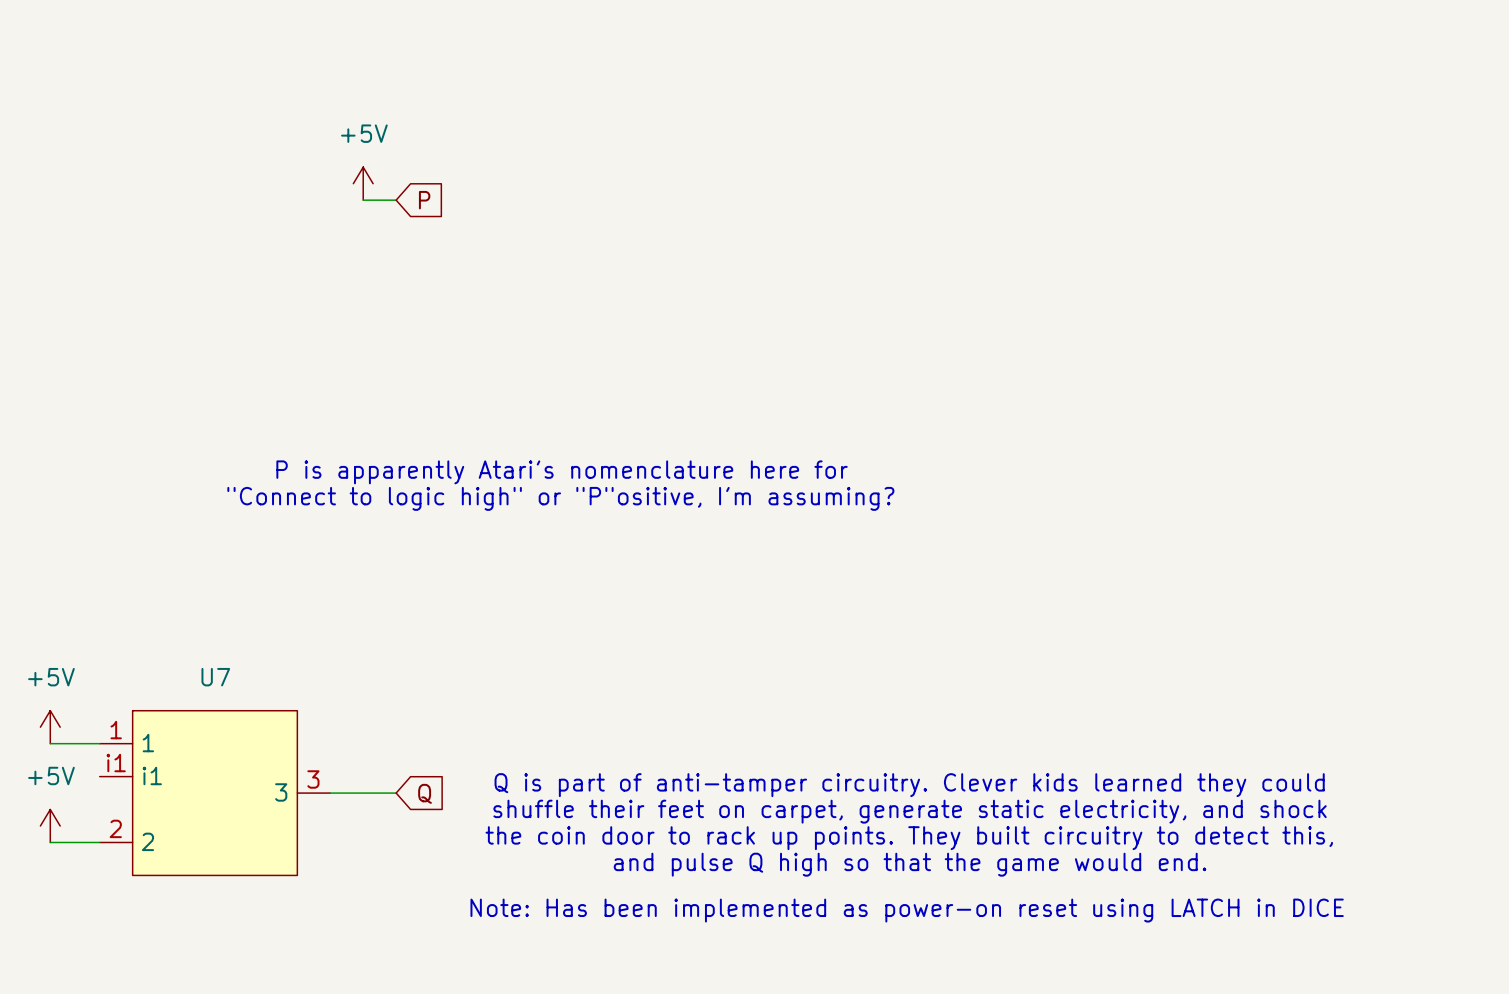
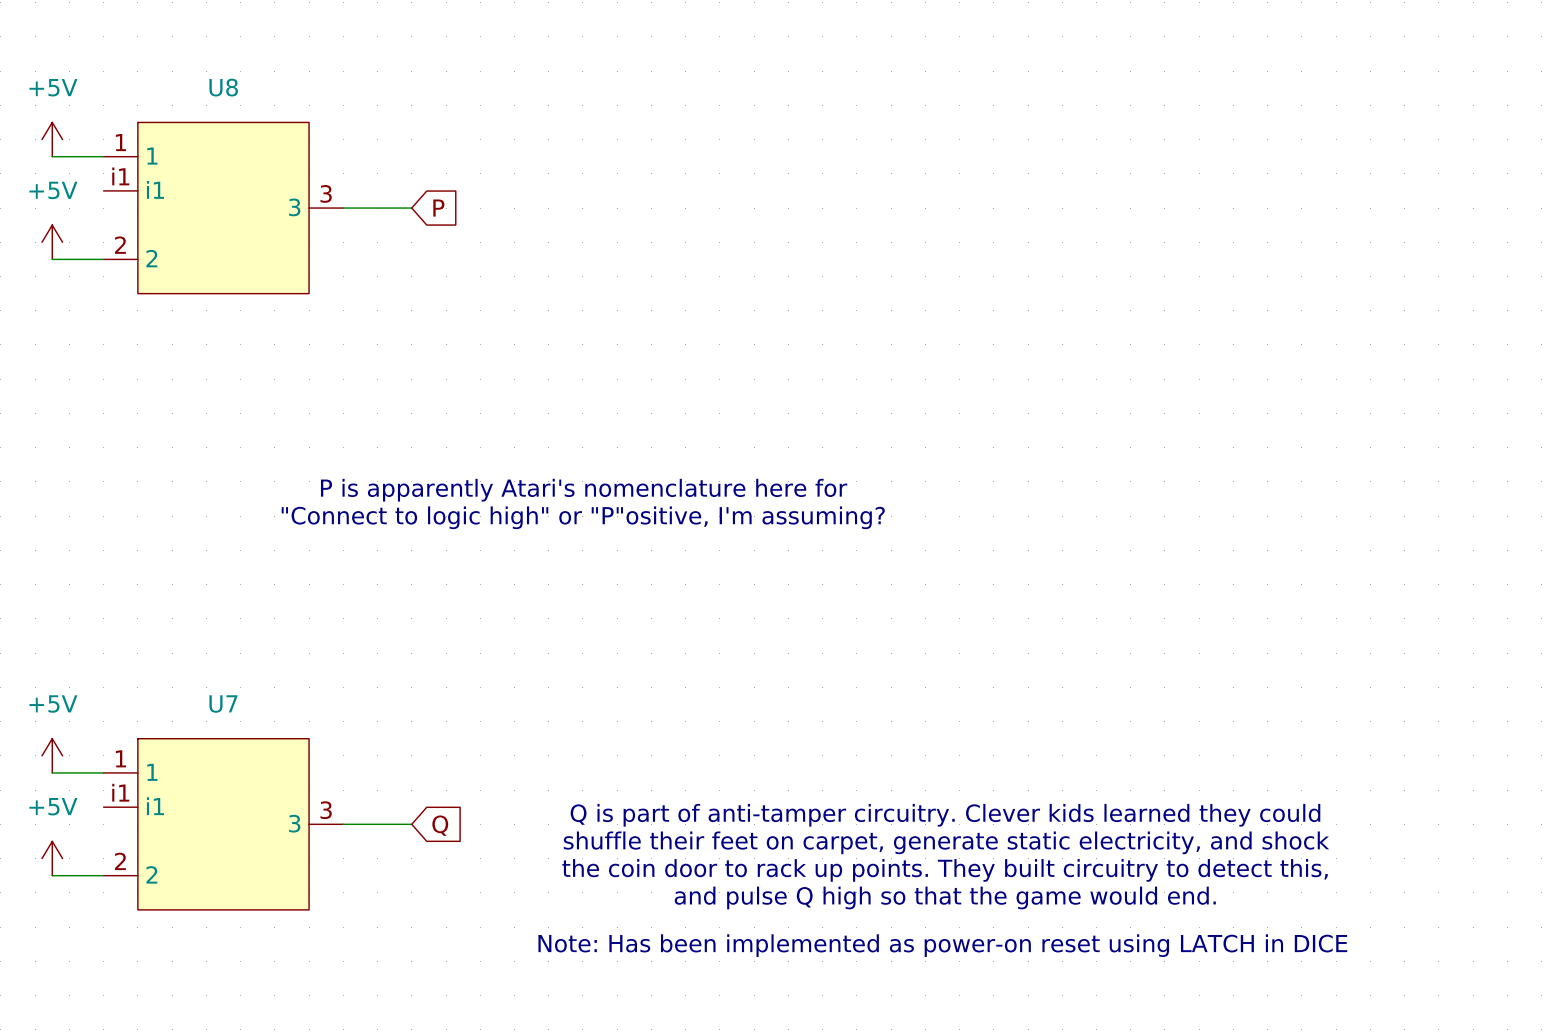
power symbol: none -> +5V (52, 139)
wire: none -> (52, 156) (103, 156)
power symbol: +5V (363, 183) -> none
U8: none -> (223, 208)
wire: none -> (343, 208) (377, 208)
power symbol: none -> +5V (52, 242)
wire: none -> (52, 259) (103, 259)

